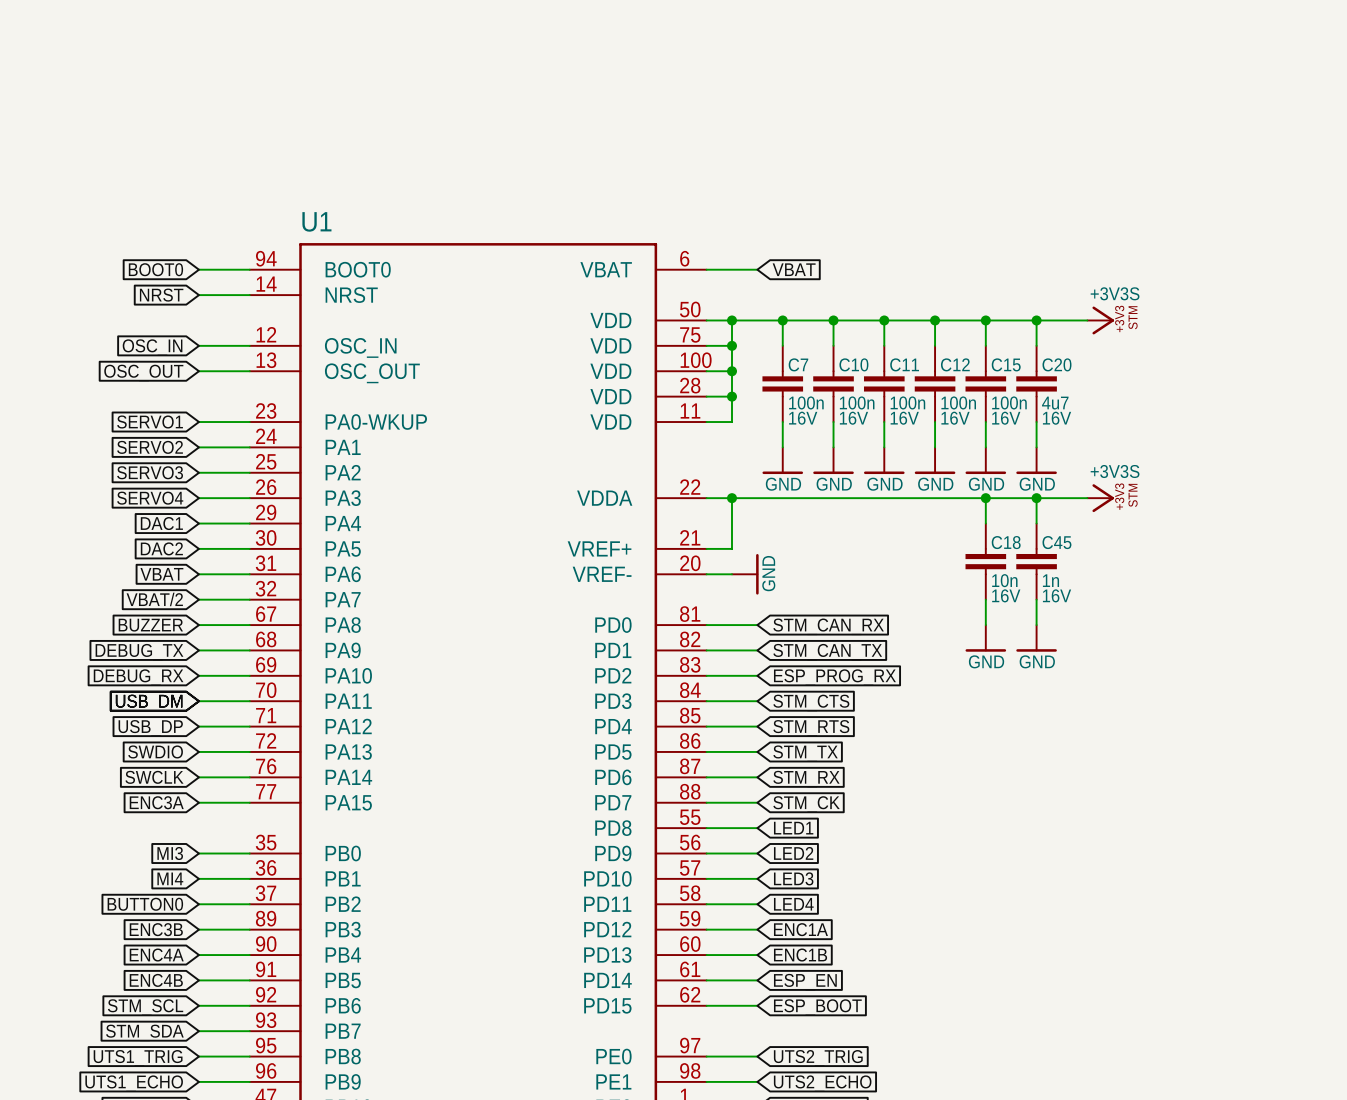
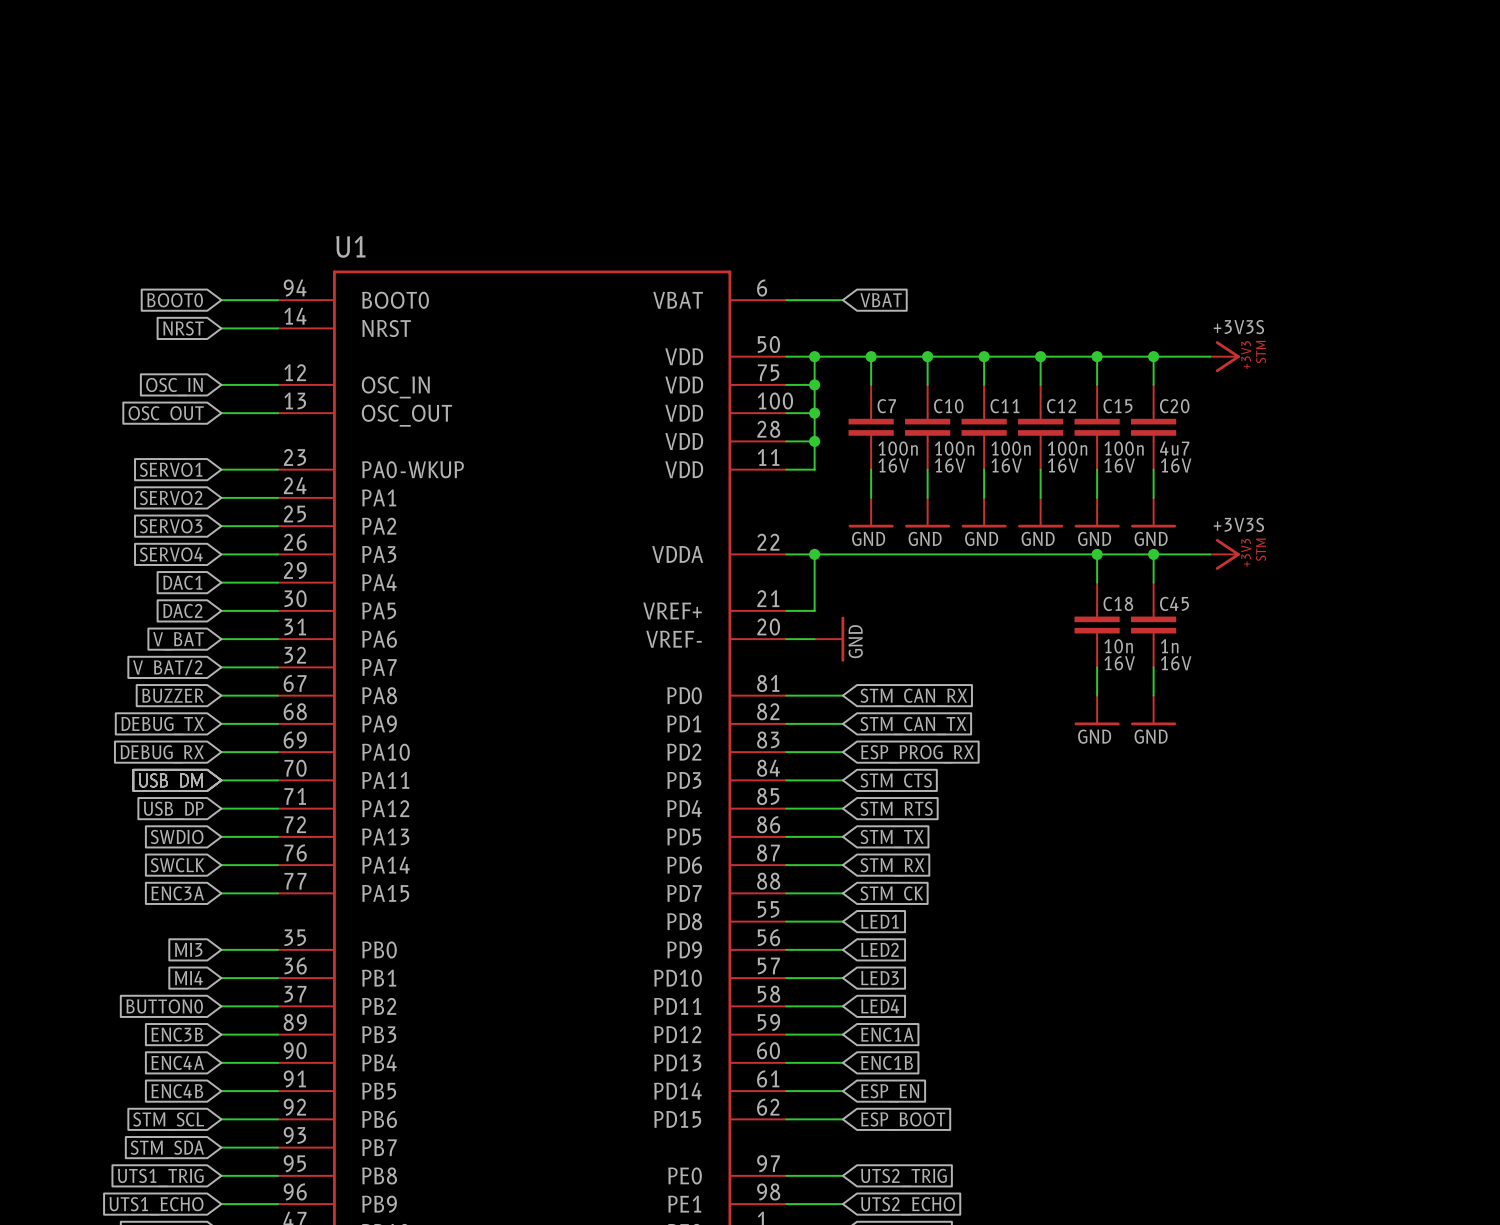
global label: VBAT (161, 574) -> V_BAT (178, 641)
global label: VBAT/2 (154, 599) -> V_BAT/2 (167, 669)

